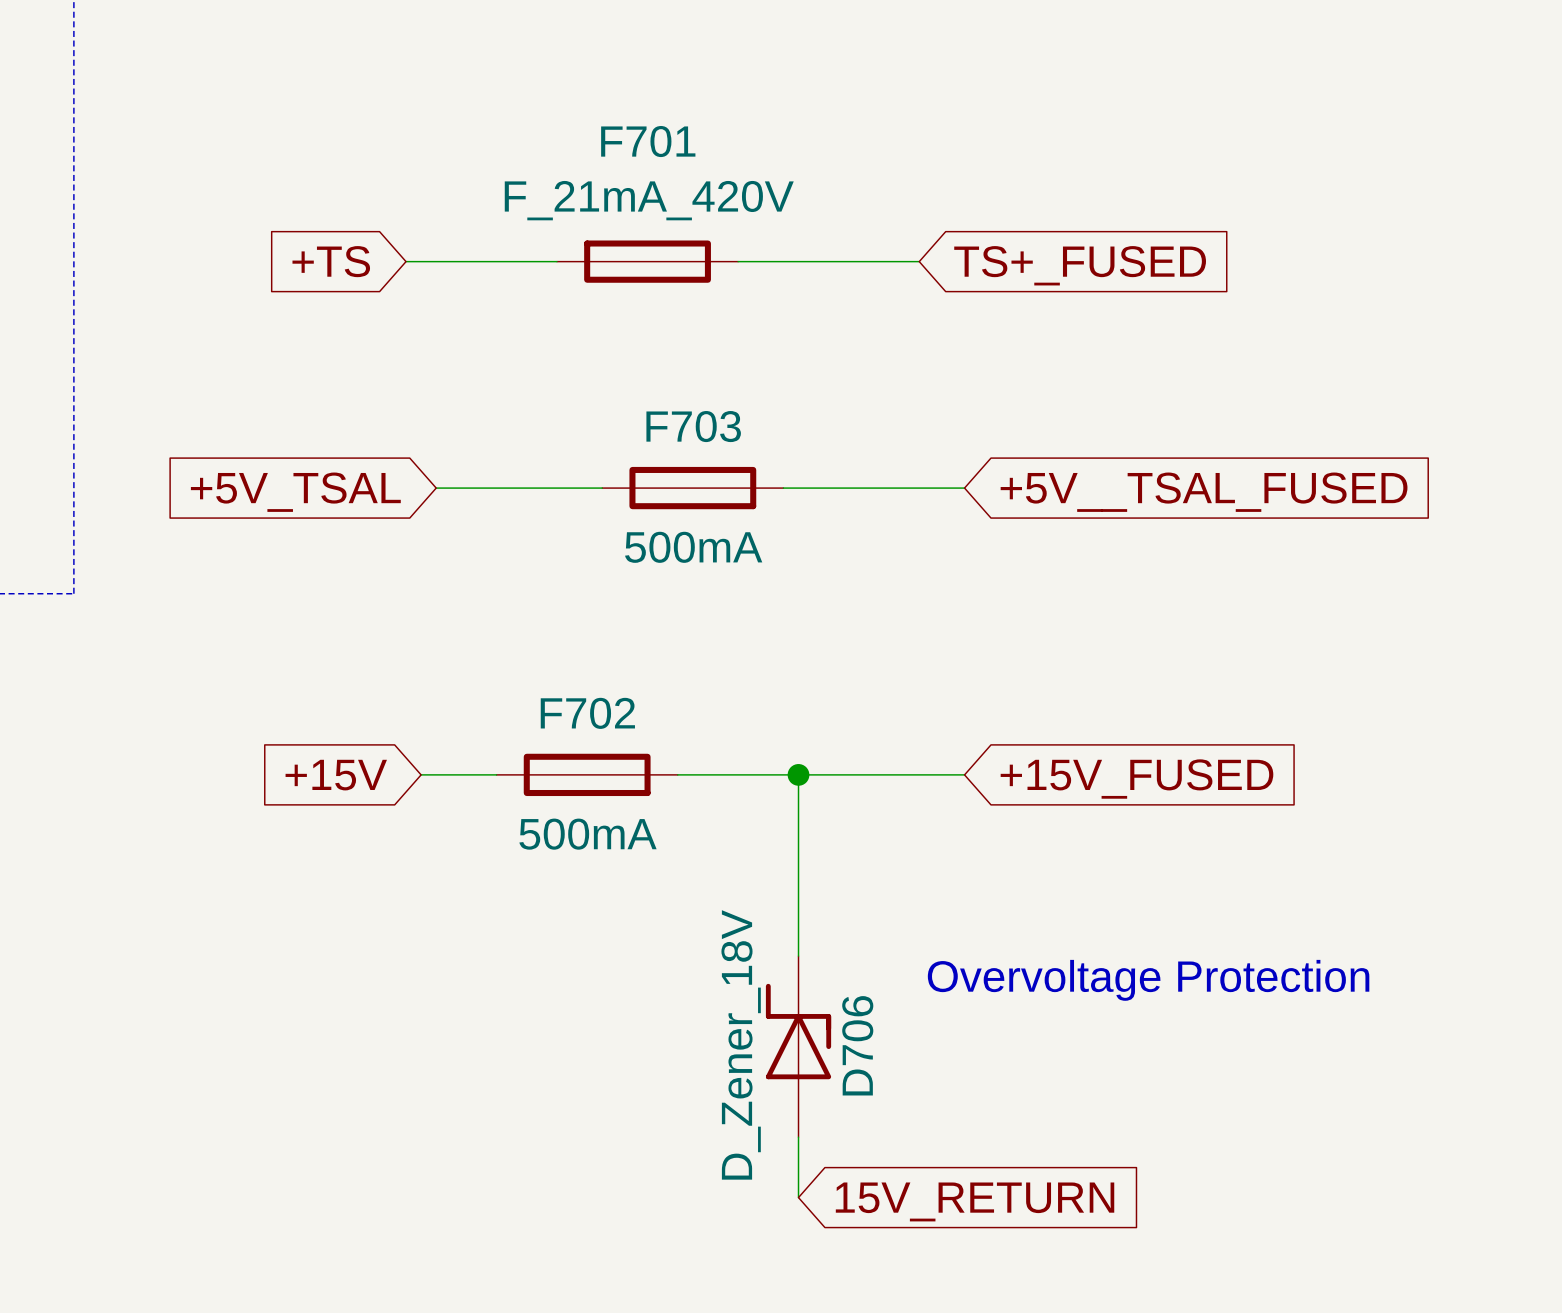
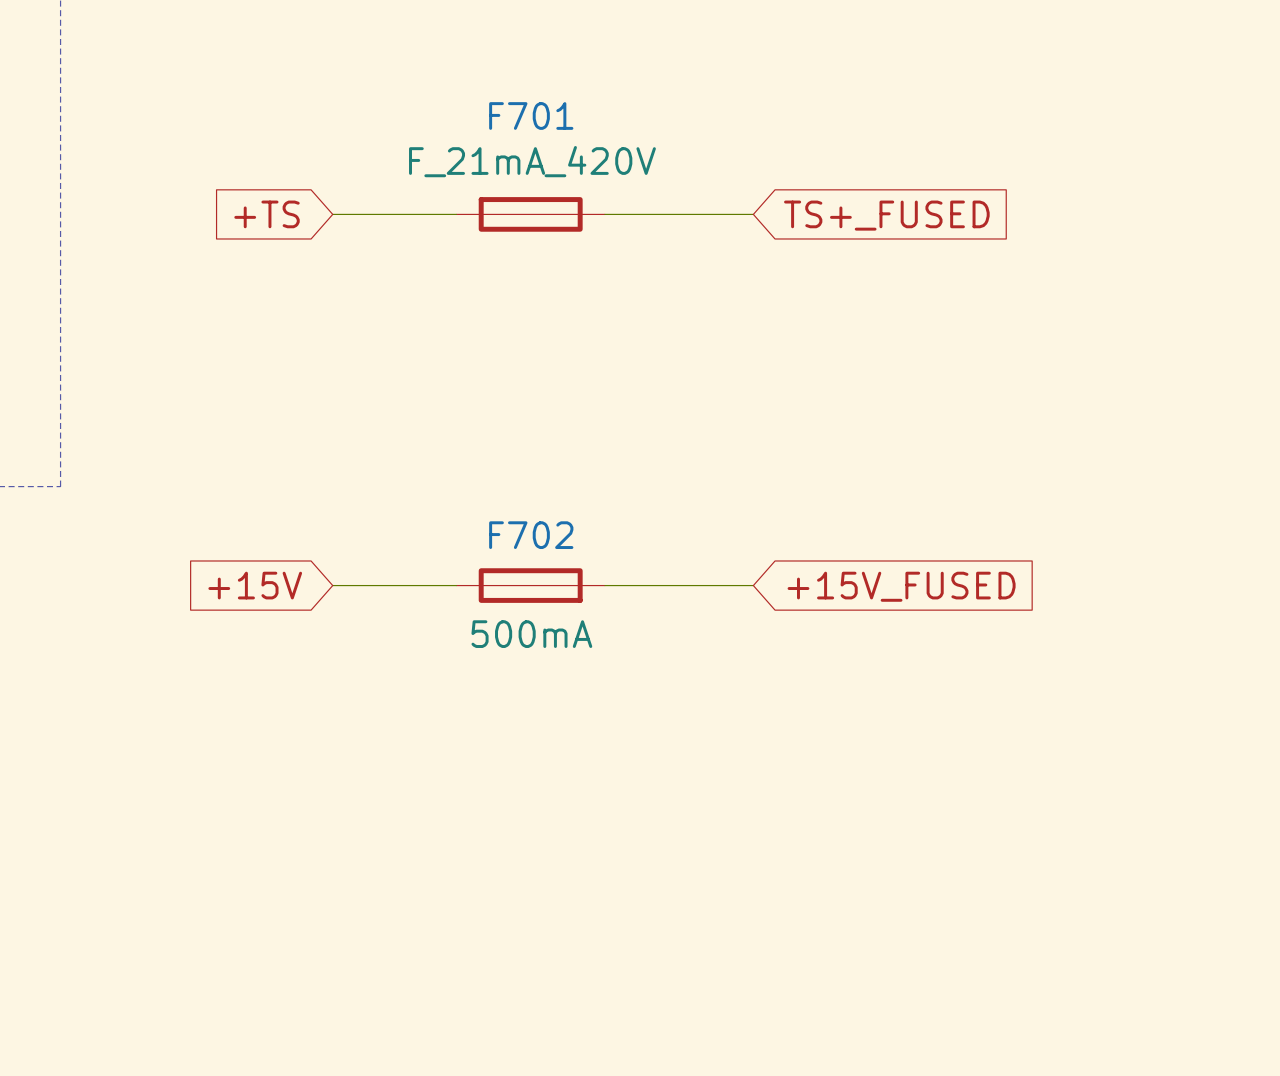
wire: (436, 488) (602, 488) -> none
F703: 500mA (692, 488) -> none
wire: (783, 488) (964, 488) -> (604, 585) (753, 585)
global label: +5V_TSAL (295, 492) -> none
global label: +5V__TSAL_FUSED (1204, 492) -> none
wire: none -> (332, 585) (456, 585)
wire: (421, 774) (496, 774) -> none
F702 position: (587, 774) -> (530, 585)
wire: (677, 774) (964, 774) -> none
wire: (798, 774) (798, 956) -> none
junction: (798, 774) -> none
global label position: +15V (336, 775) -> +15V (255, 585)
global label position: +15V_FUSED (1136, 779) -> +15V_FUSED (901, 586)
text: Overvoltage Protection (1148, 980) -> none
D706: D_Zener_18V (798, 1046) -> none
wire: (798, 1137) (798, 1197) -> none
global label: 15V_RETURN (975, 1201) -> none

